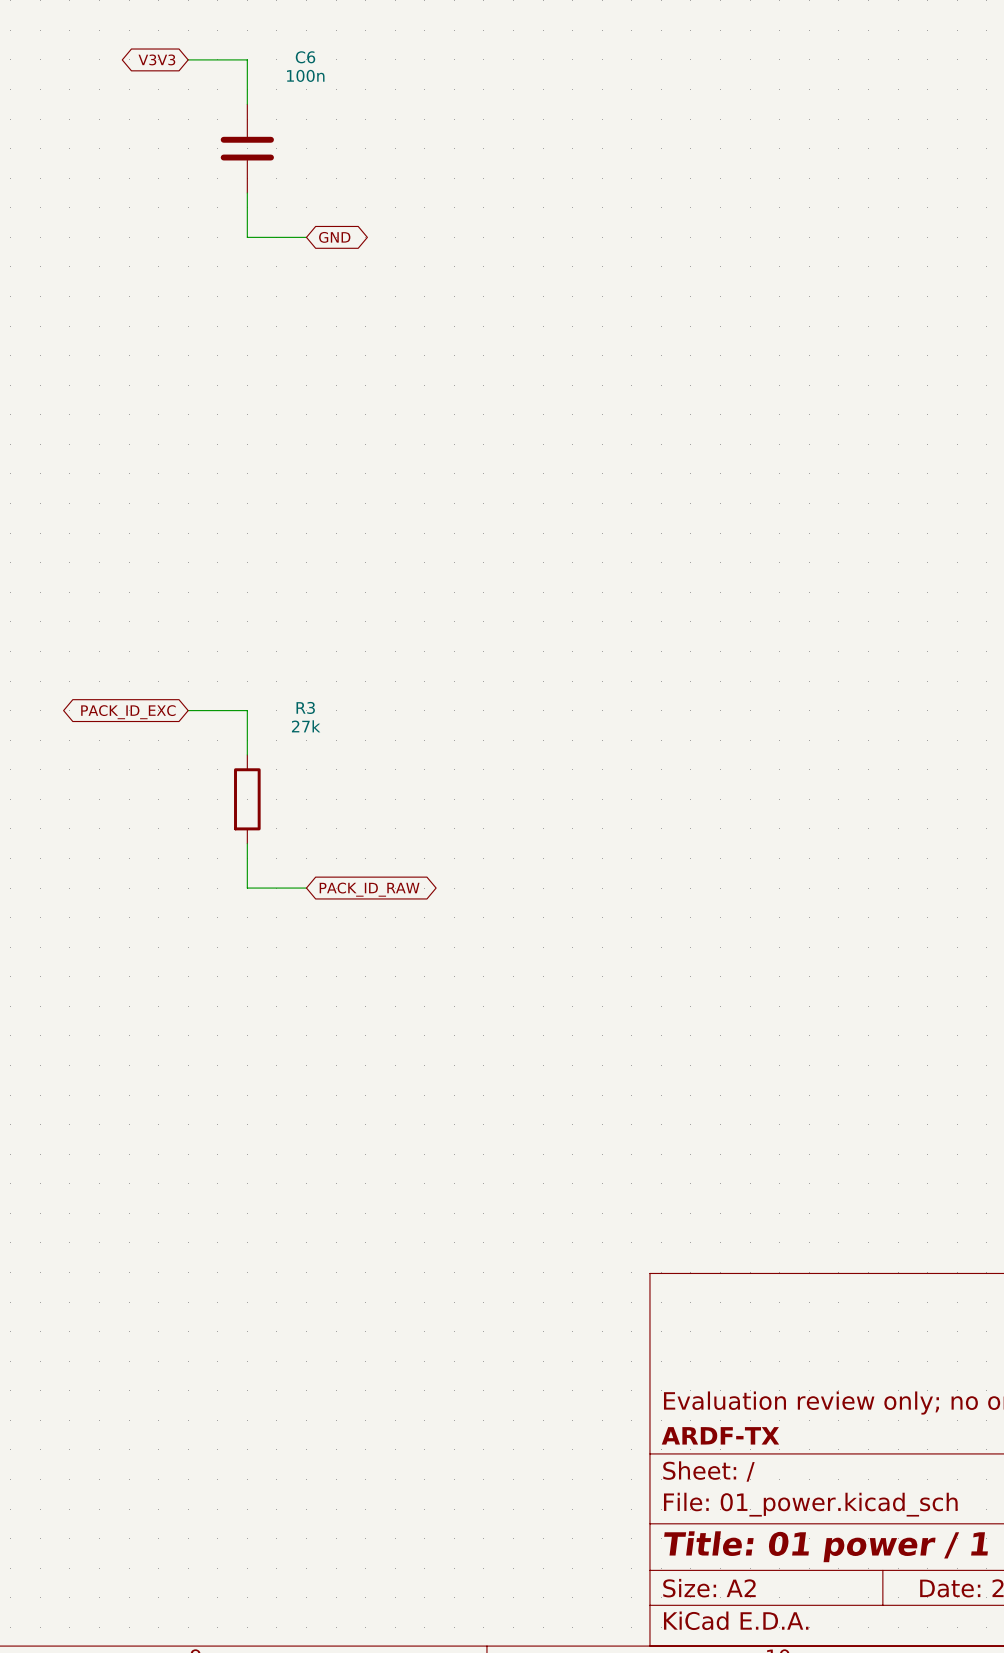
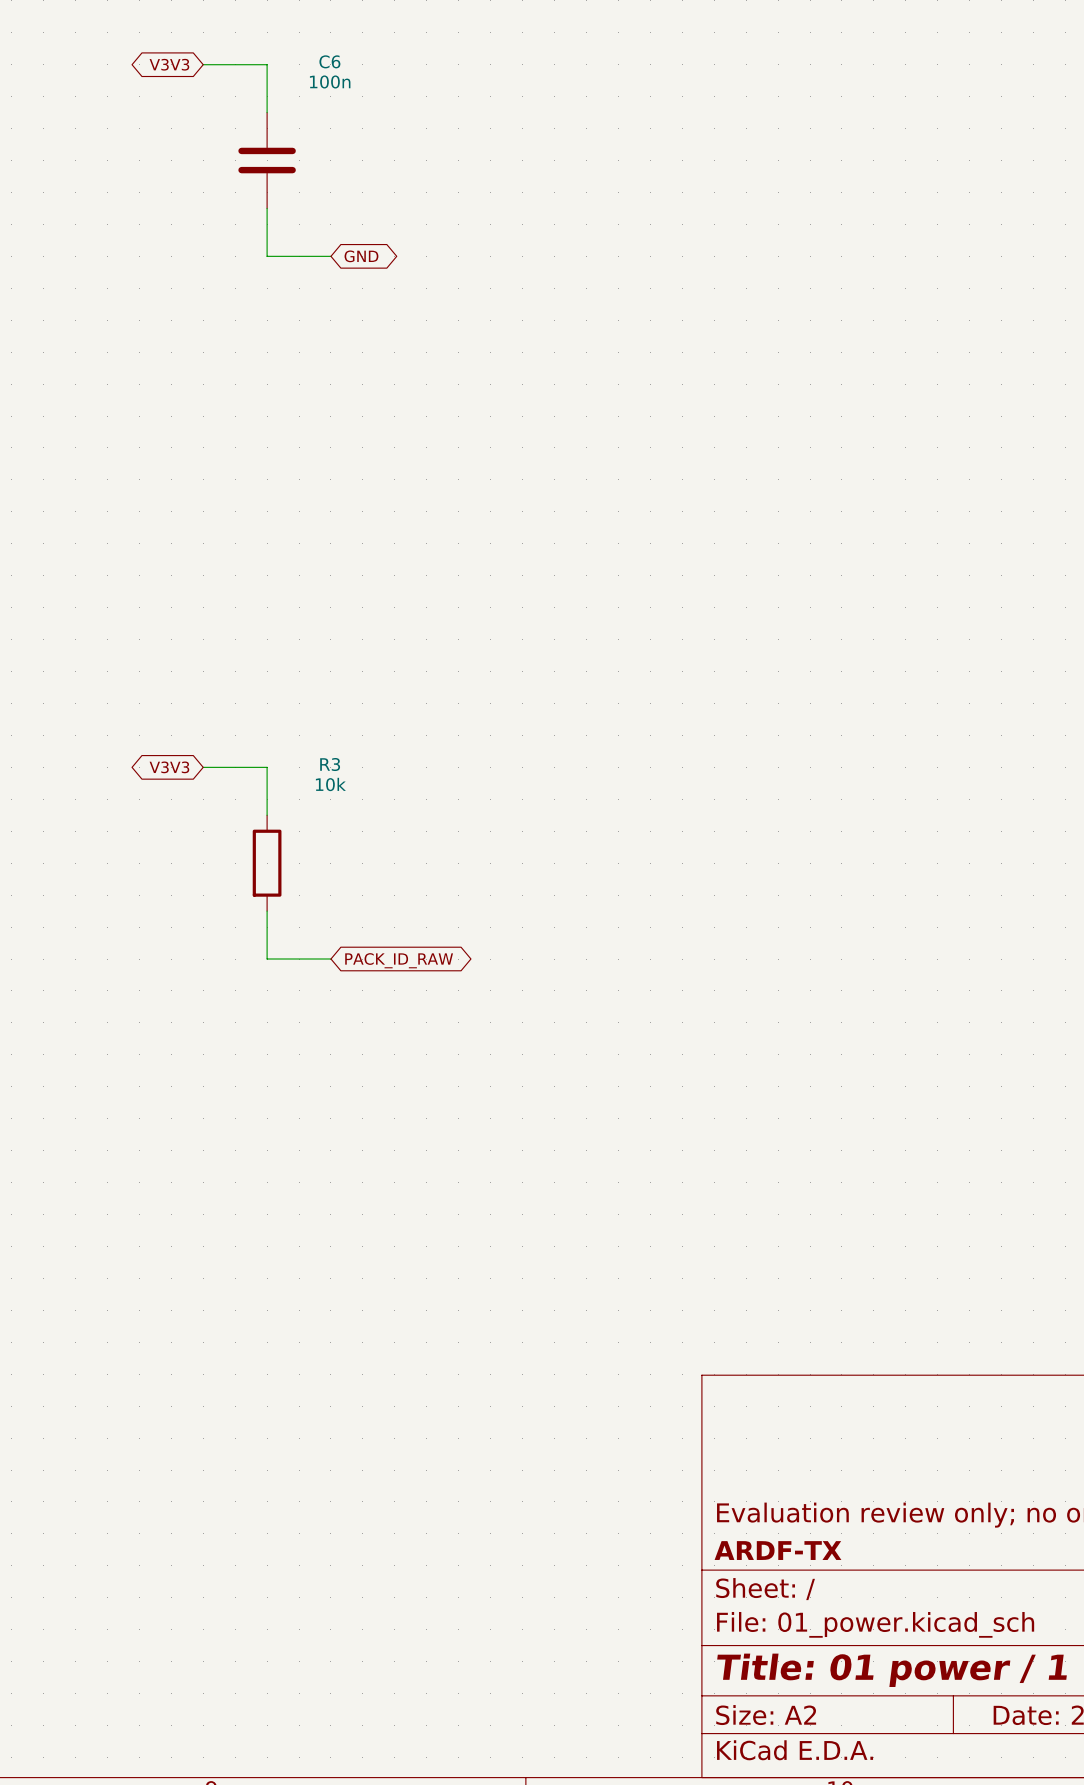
global label: PACK_ID_EXC (128, 712) -> V3V3 (169, 767)
R3 value: 27k (306, 726) -> 10k (330, 784)

